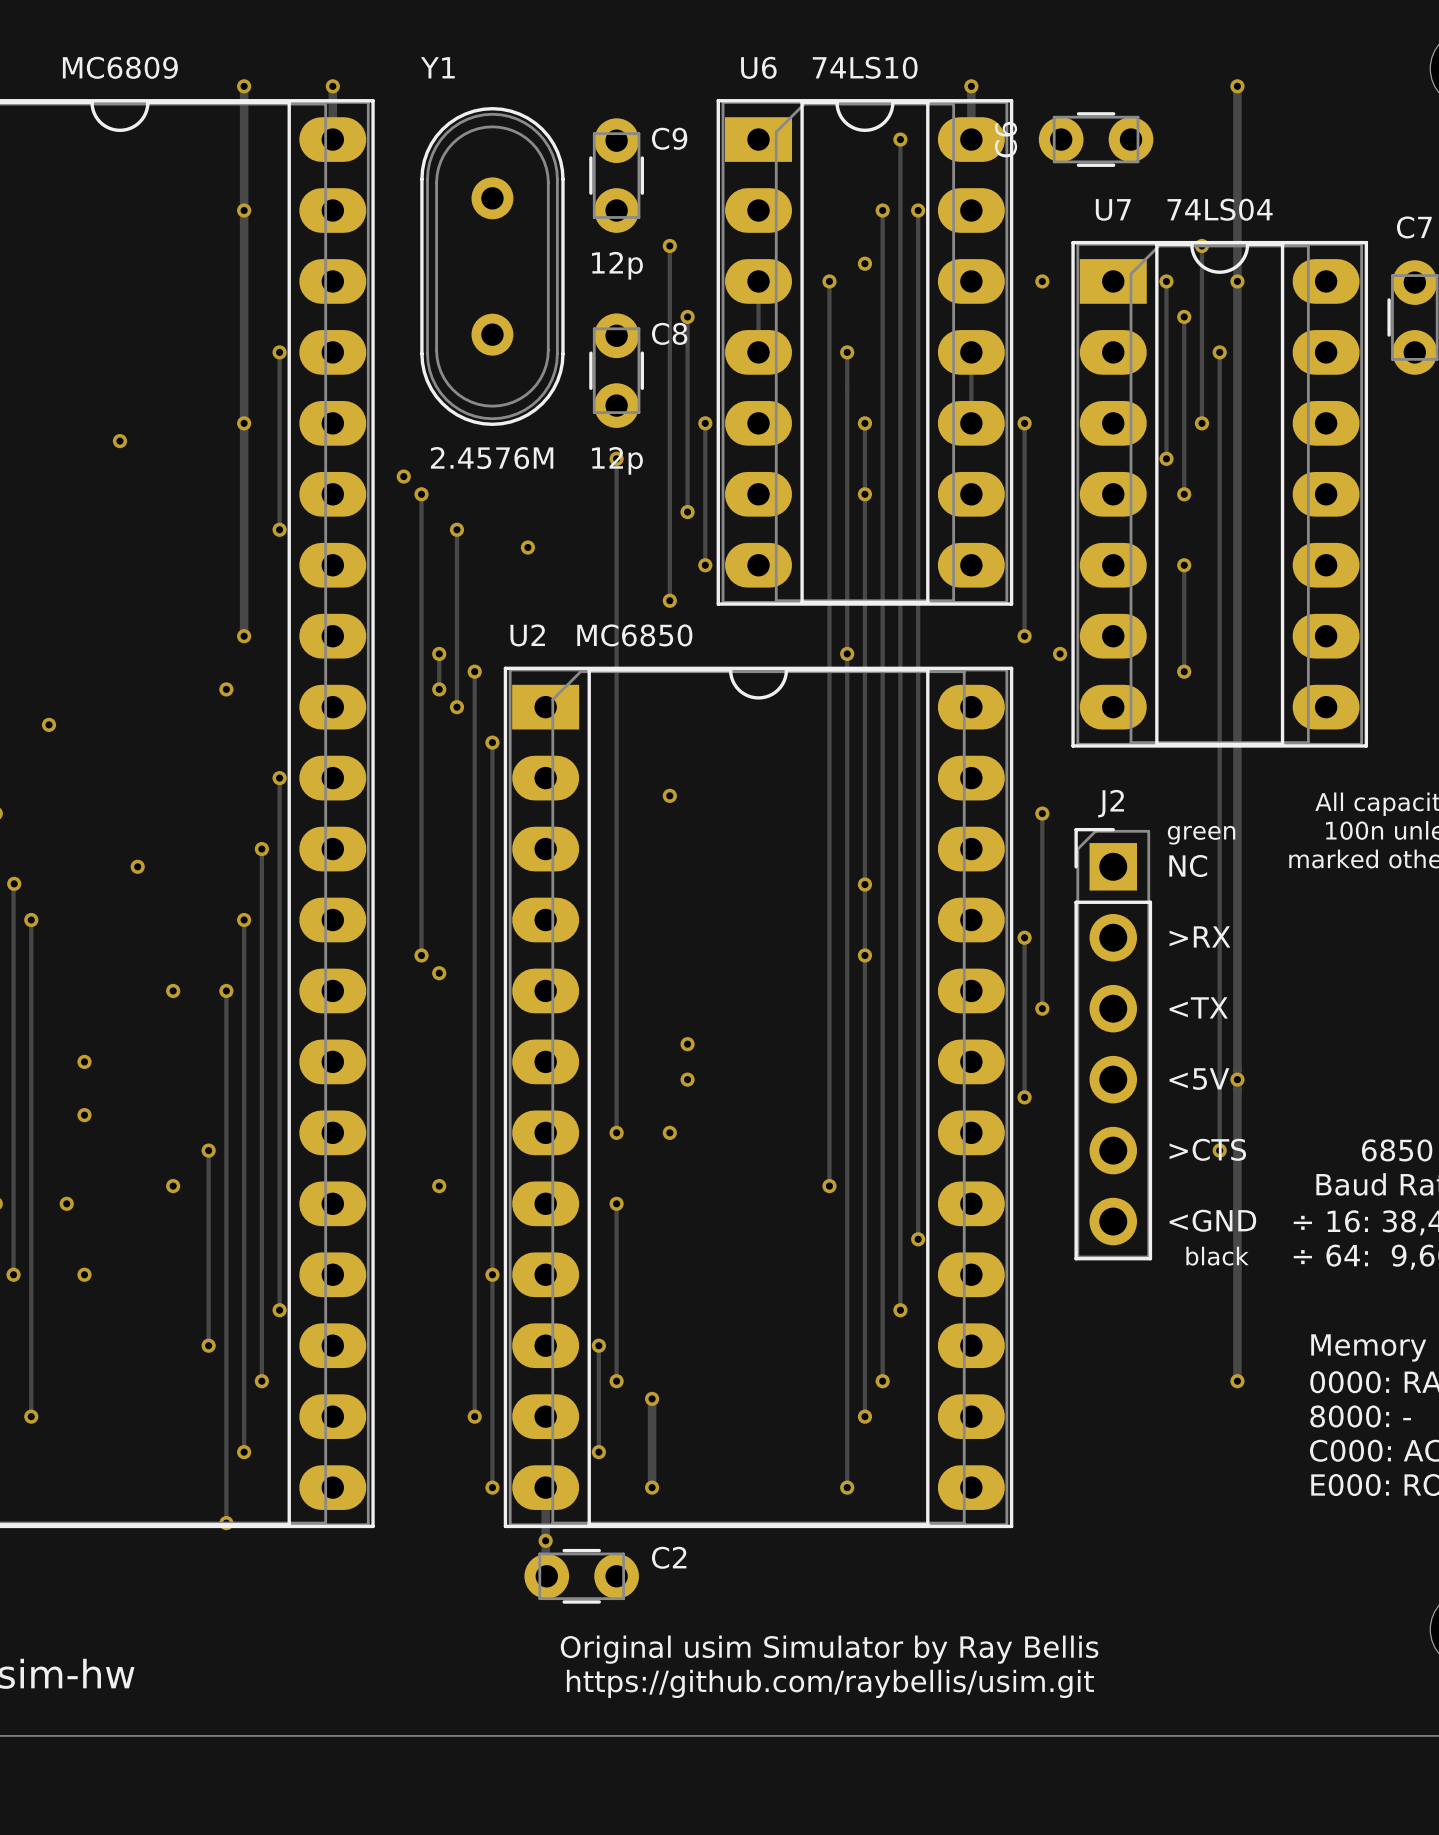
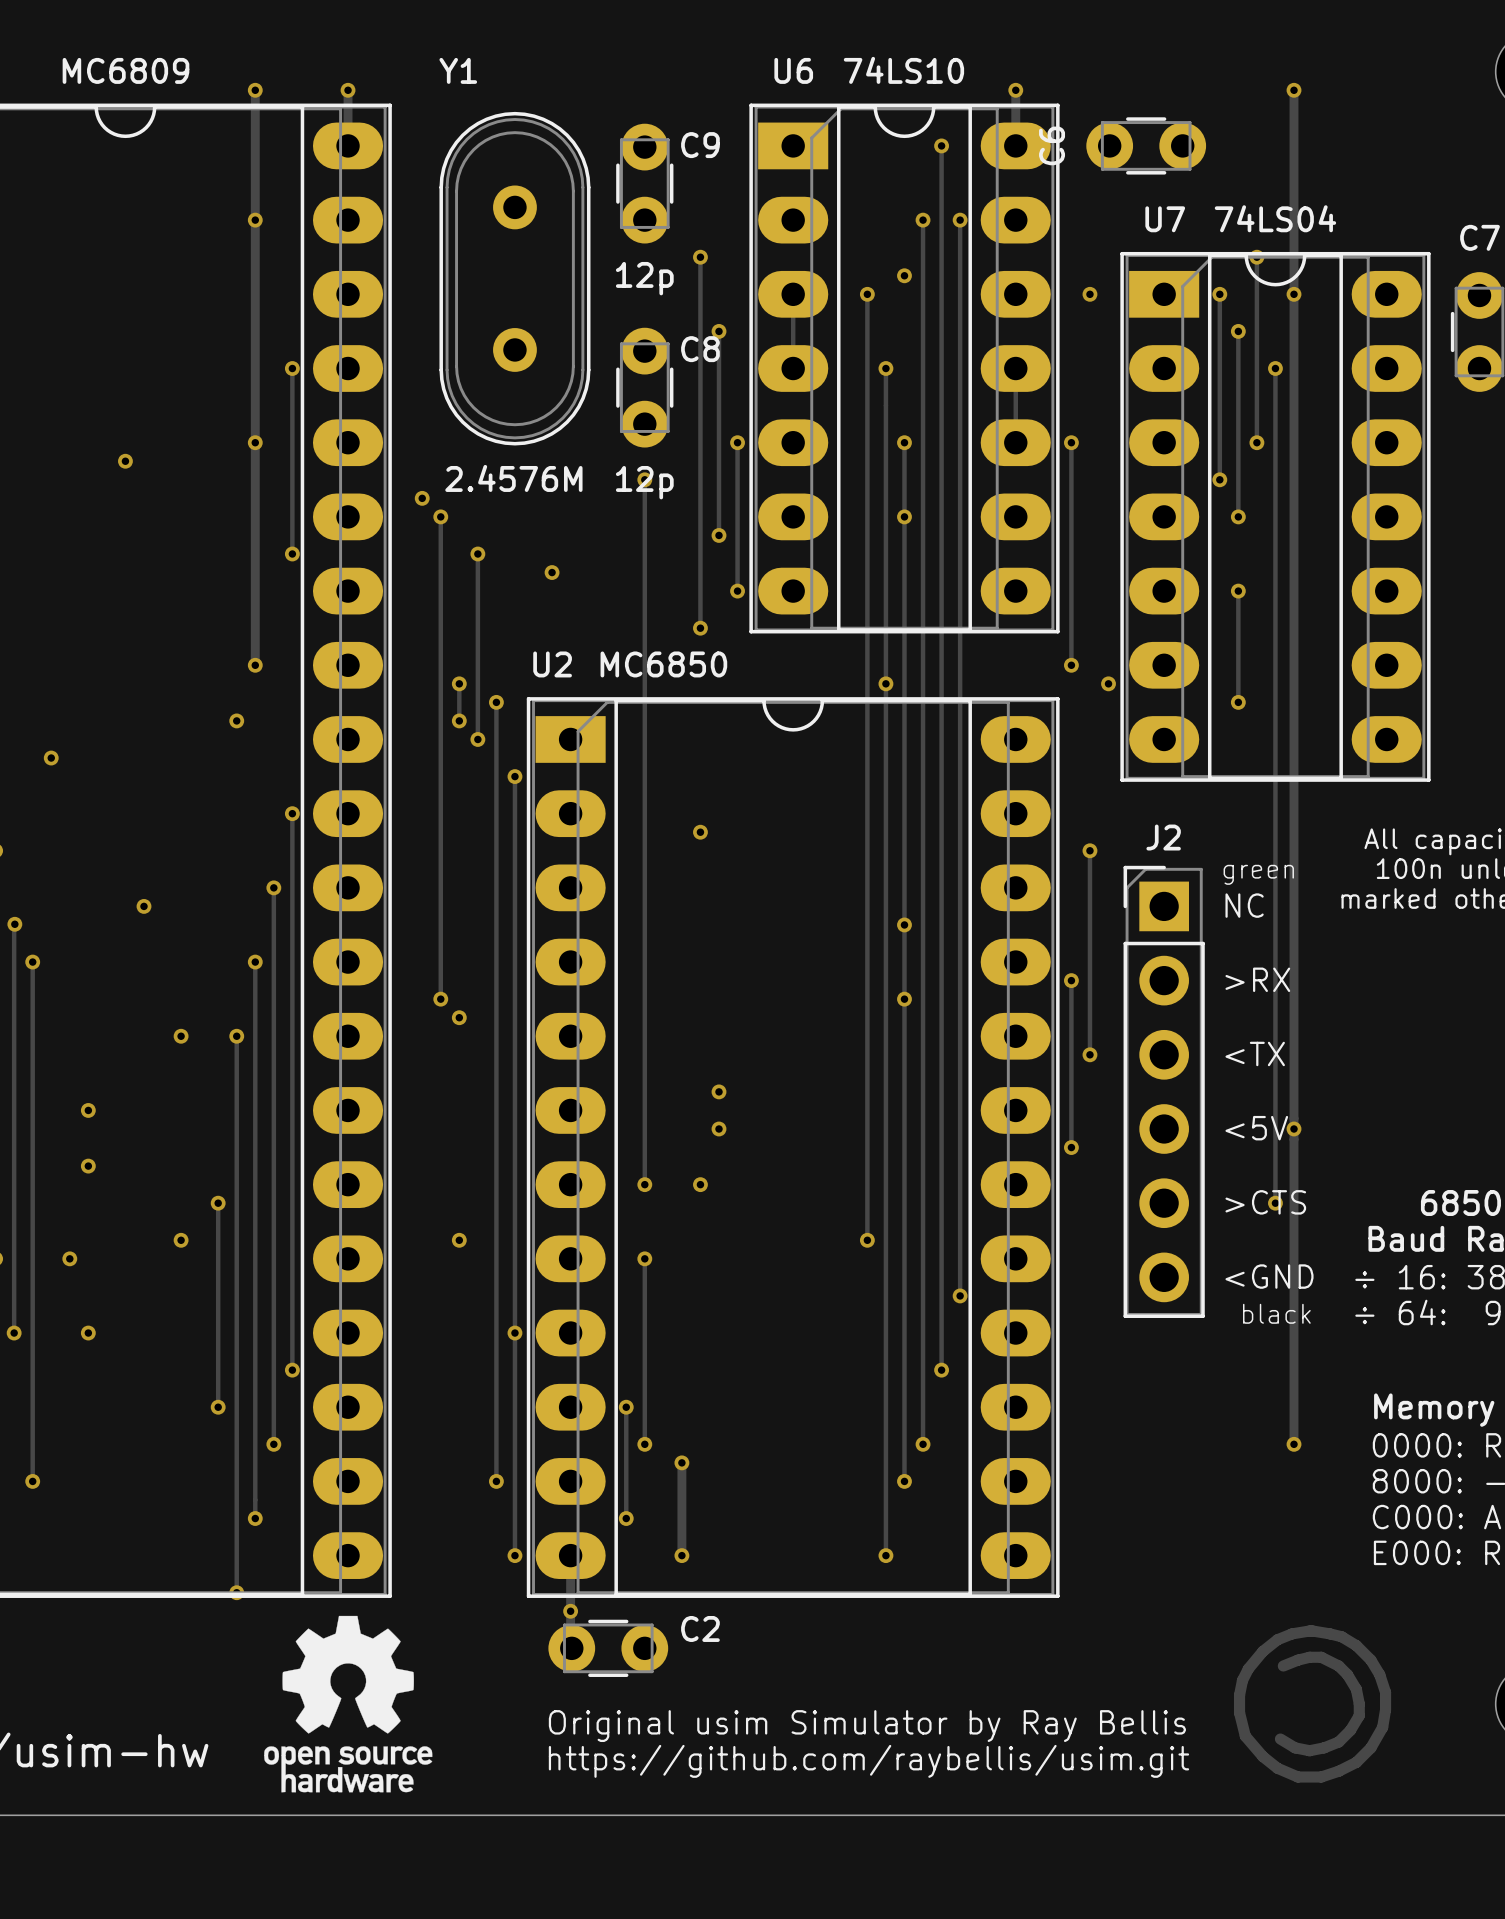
drawing: none -> [264, 1615, 433, 1793]
drawing: none -> [1233, 1625, 1392, 1783]

